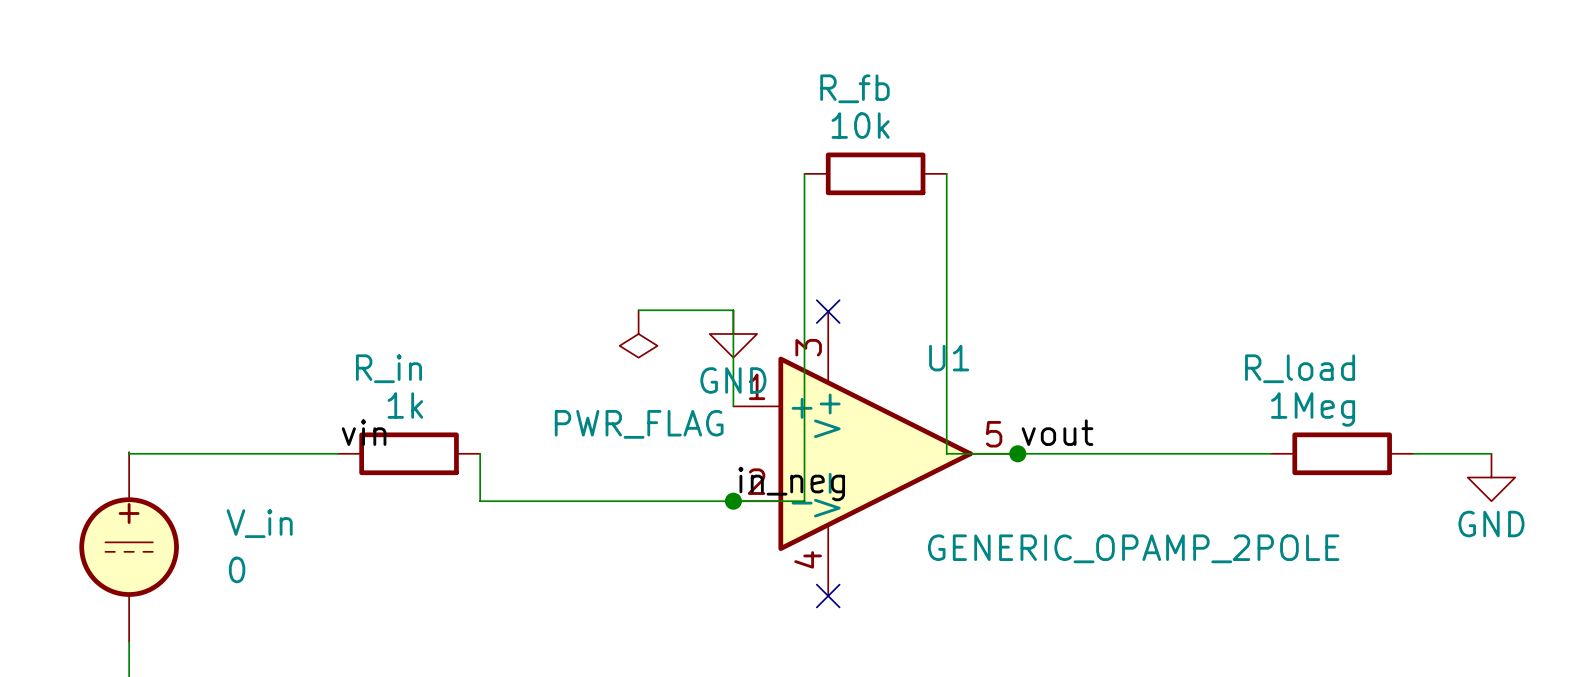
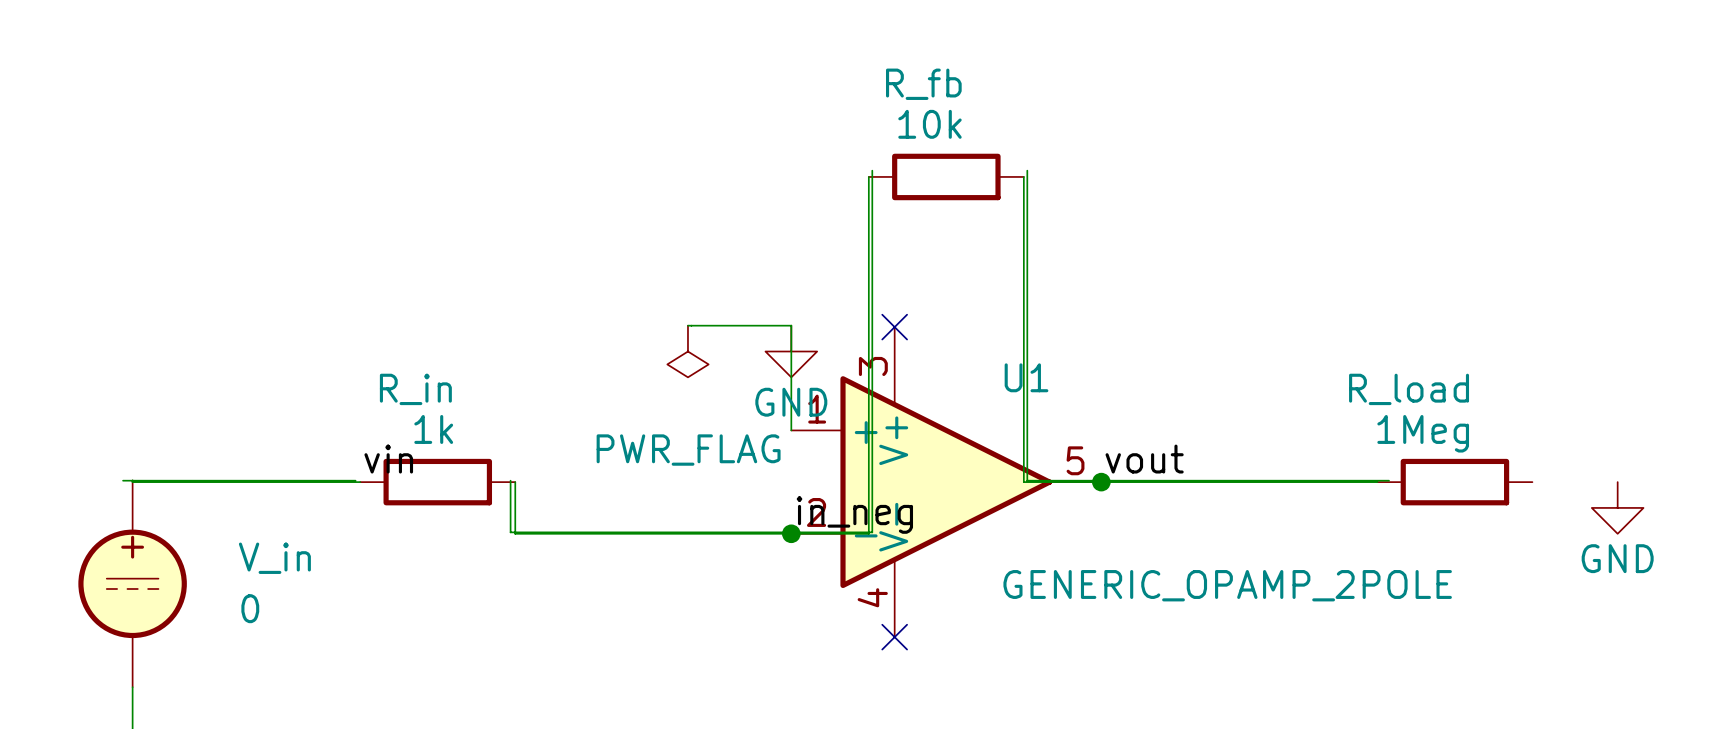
wire: none -> (872, 170) (872, 532) (510, 532) (510, 480)
wire: none -> (1027, 170) (1027, 480) (1389, 480)
wire: none -> (123, 480) (355, 480)
wire: (1413, 453) (1491, 453) -> none

